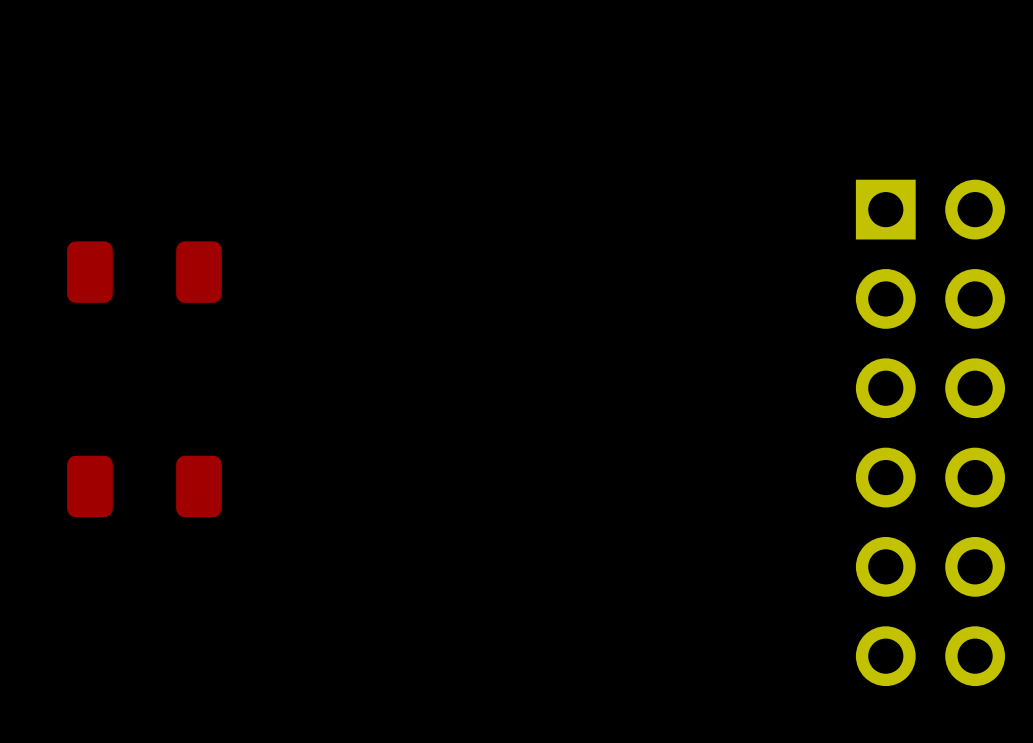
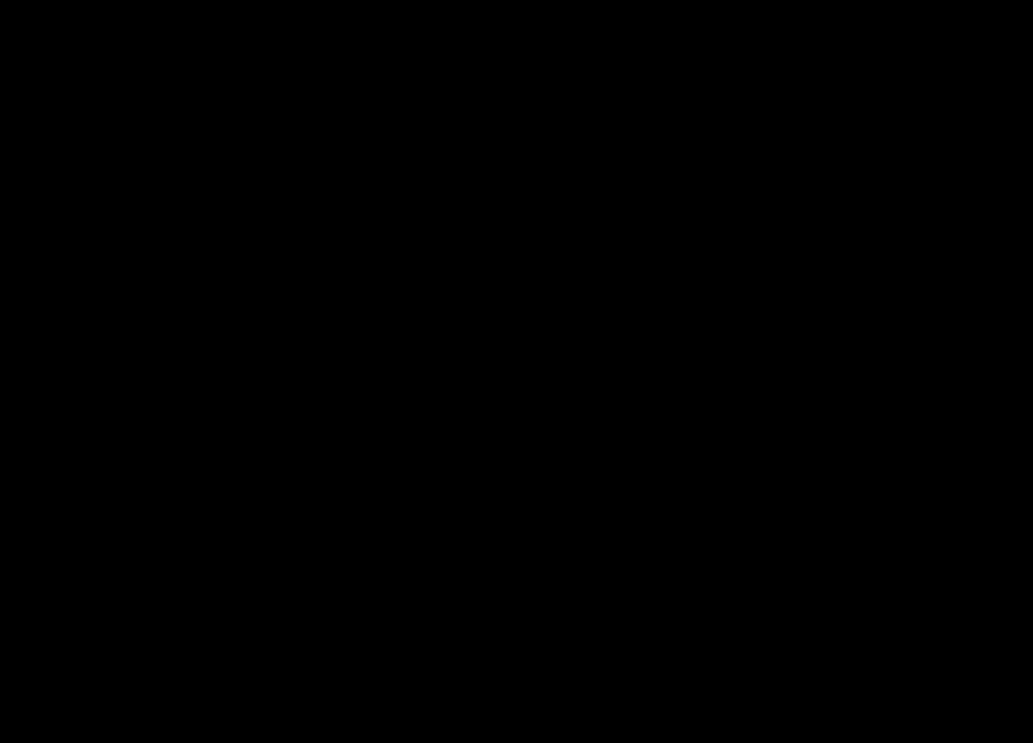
part: (144, 272) -> none
part: (930, 432) -> none
part: (144, 486) -> none

